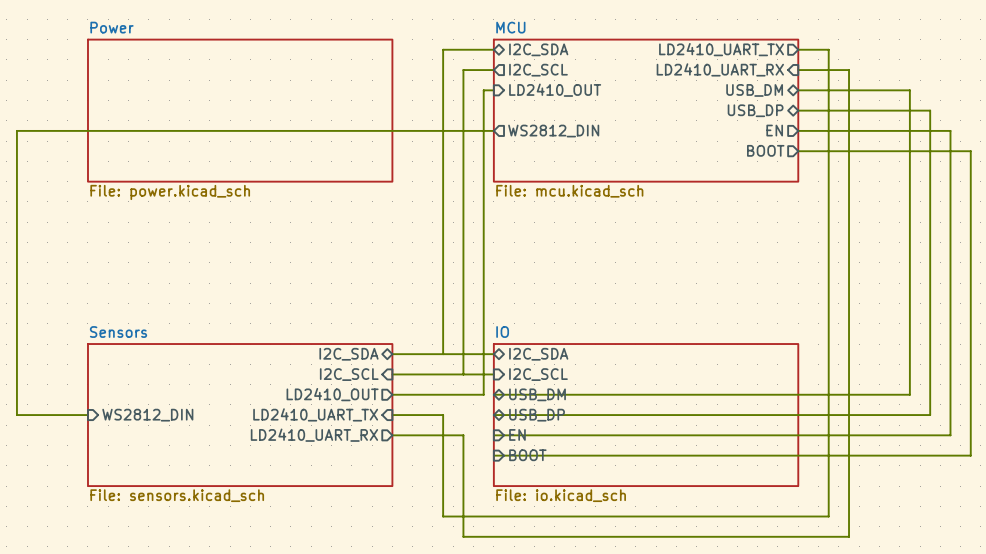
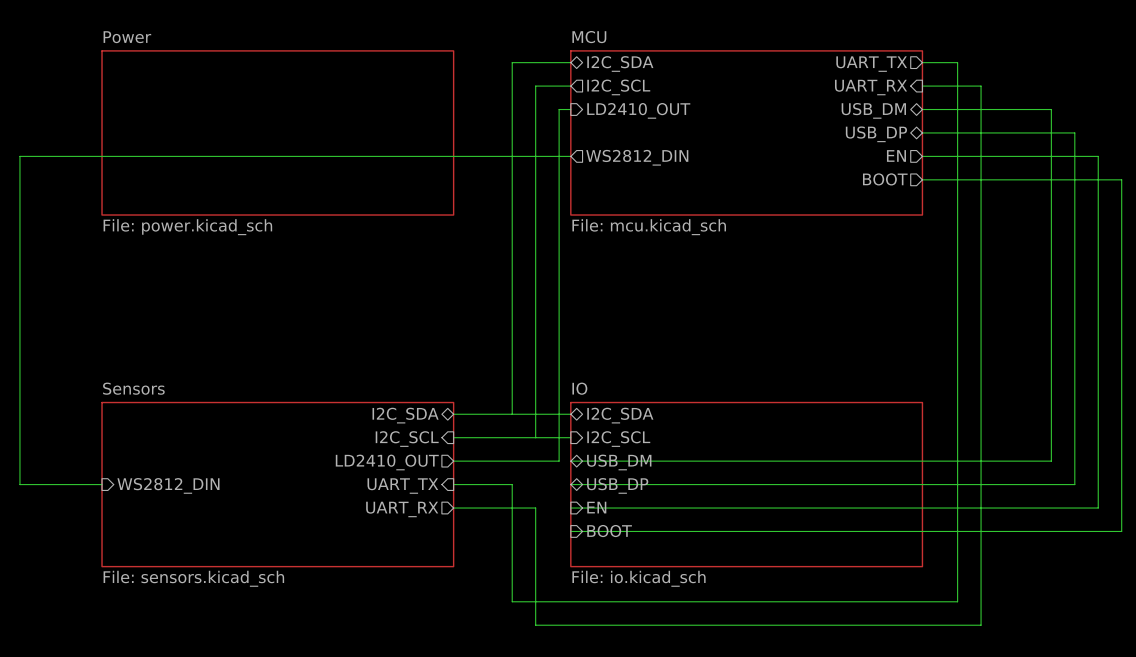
sheet pin: LD2410_UART_TX (721, 49) -> UART_TX (871, 64)
sheet pin: LD2410_UART_RX (720, 69) -> UART_RX (871, 87)
sheet pin: LD2410_UART_TX (315, 414) -> UART_TX (402, 486)
sheet pin: LD2410_UART_RX (314, 435) -> UART_RX (402, 509)

